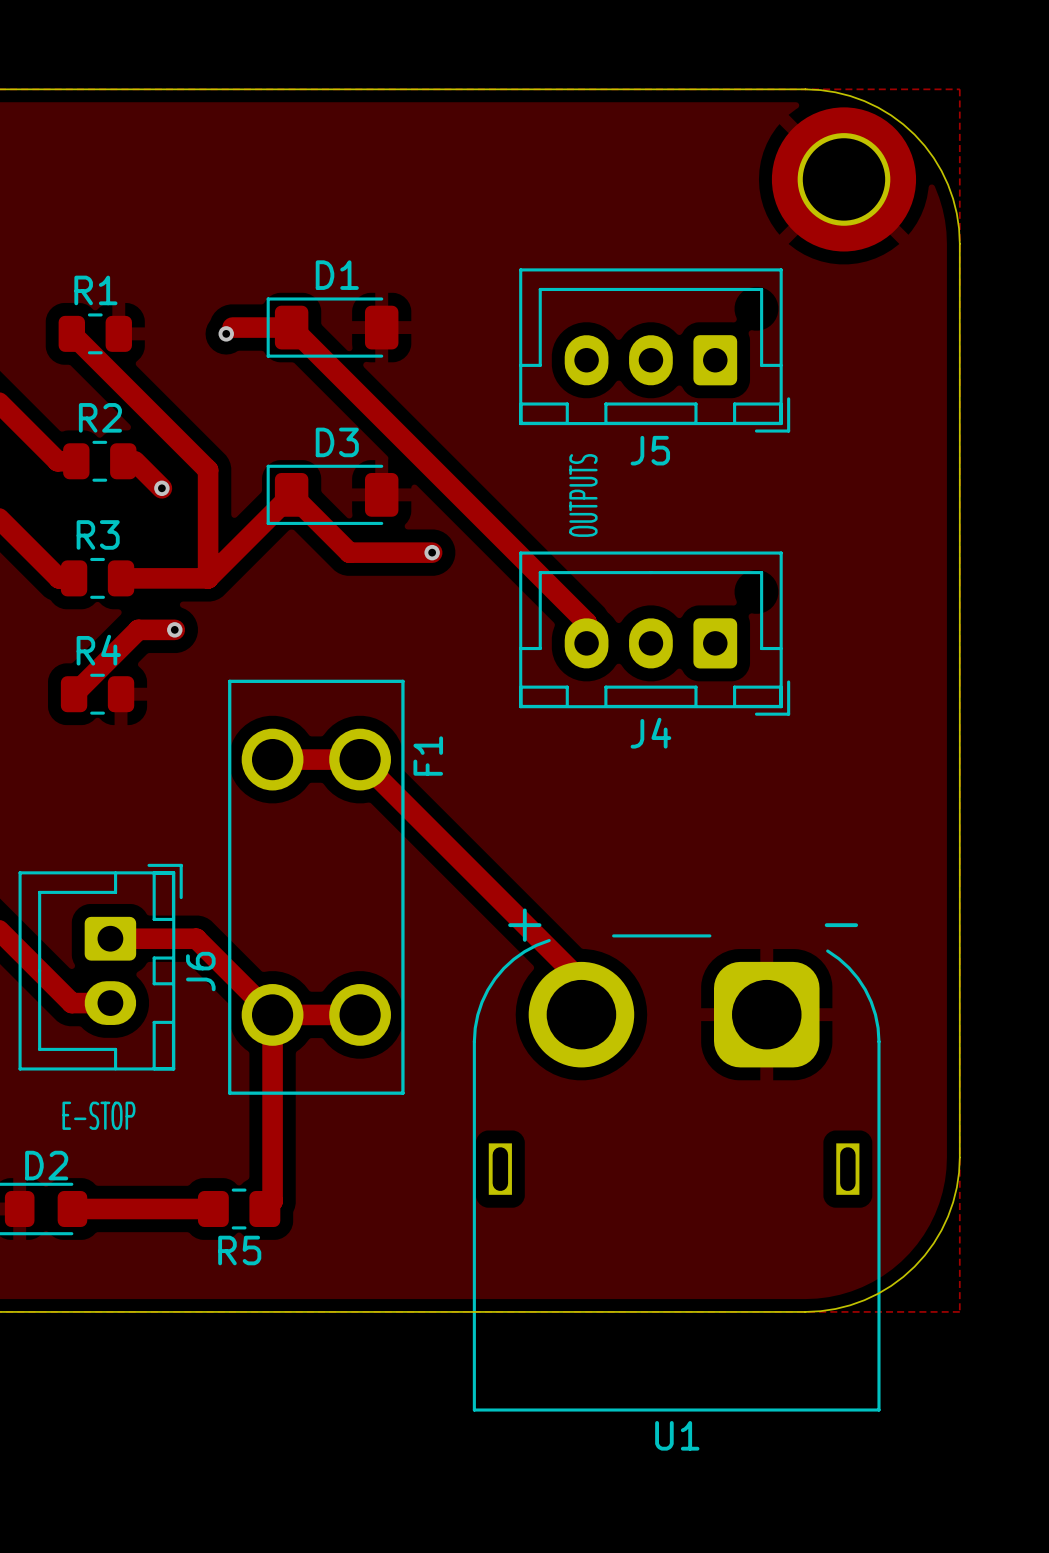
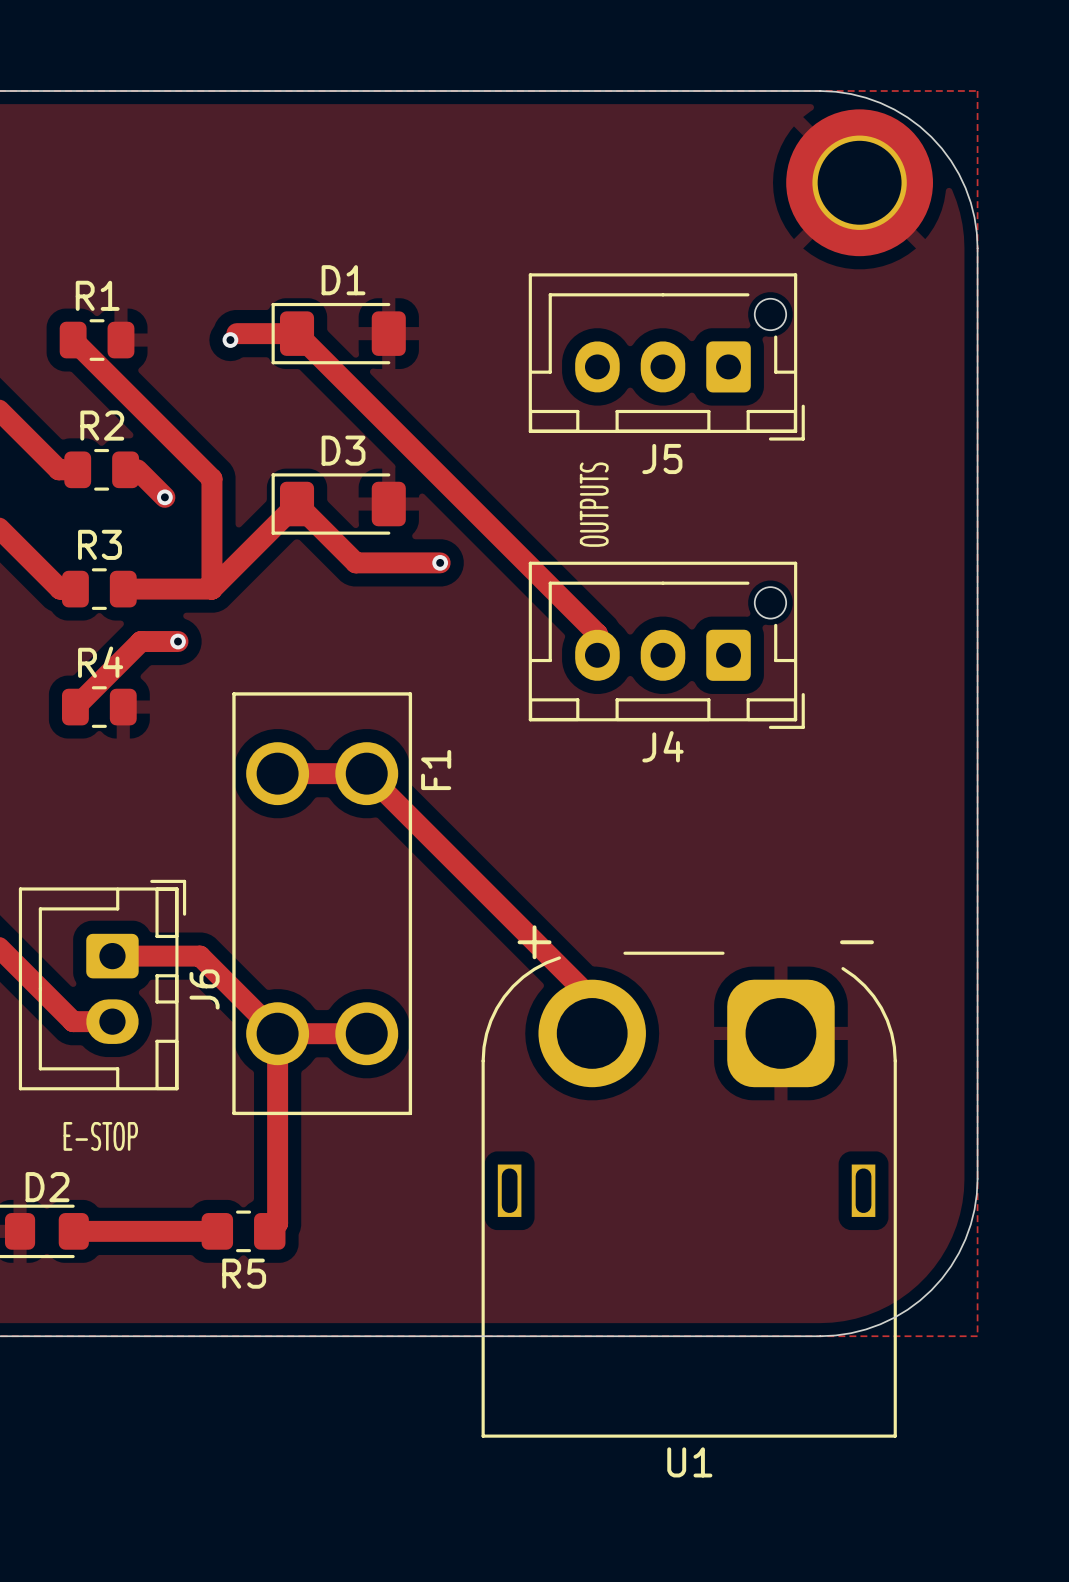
J5 footprint: [519, 268, 791, 433] -> [528, 273, 805, 441]
J4 footprint: [519, 551, 791, 716] -> [528, 561, 805, 729]

